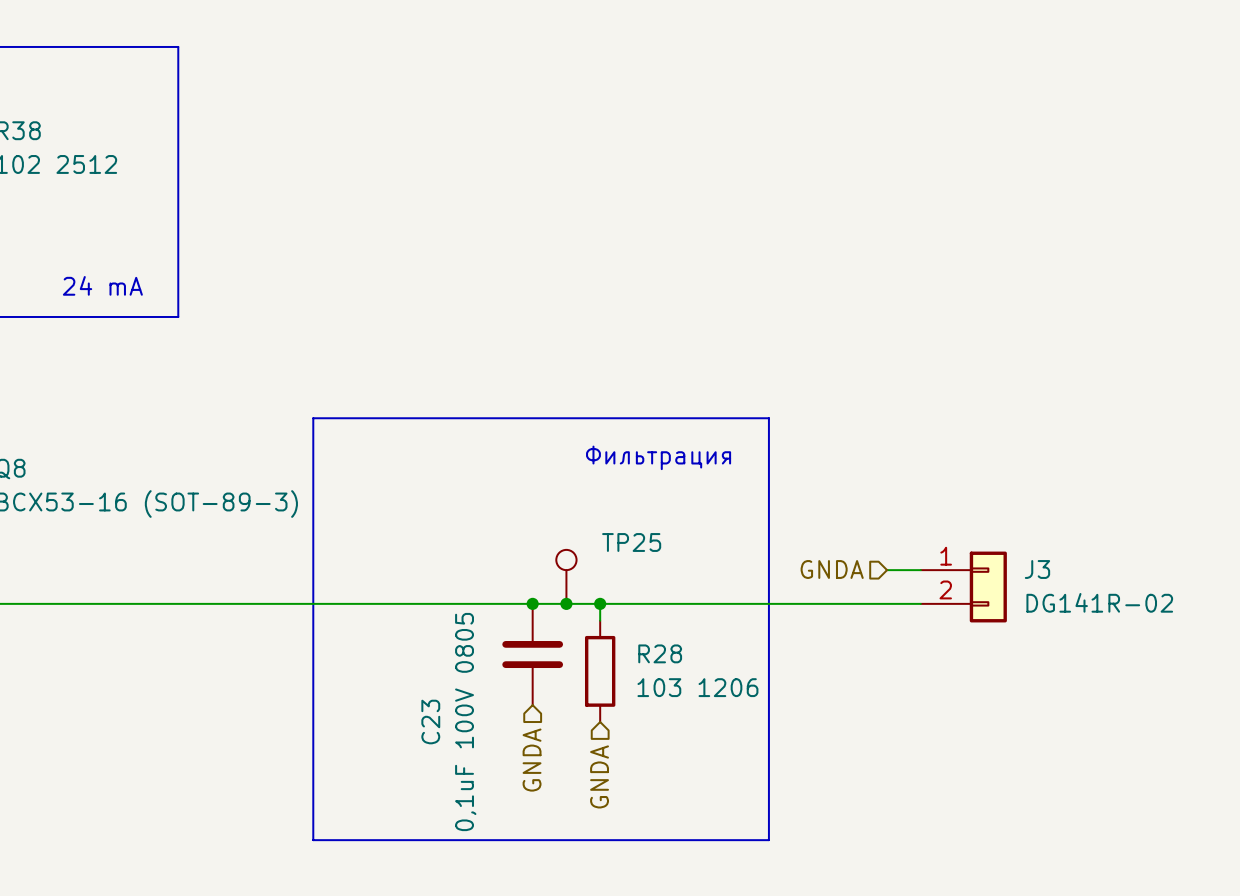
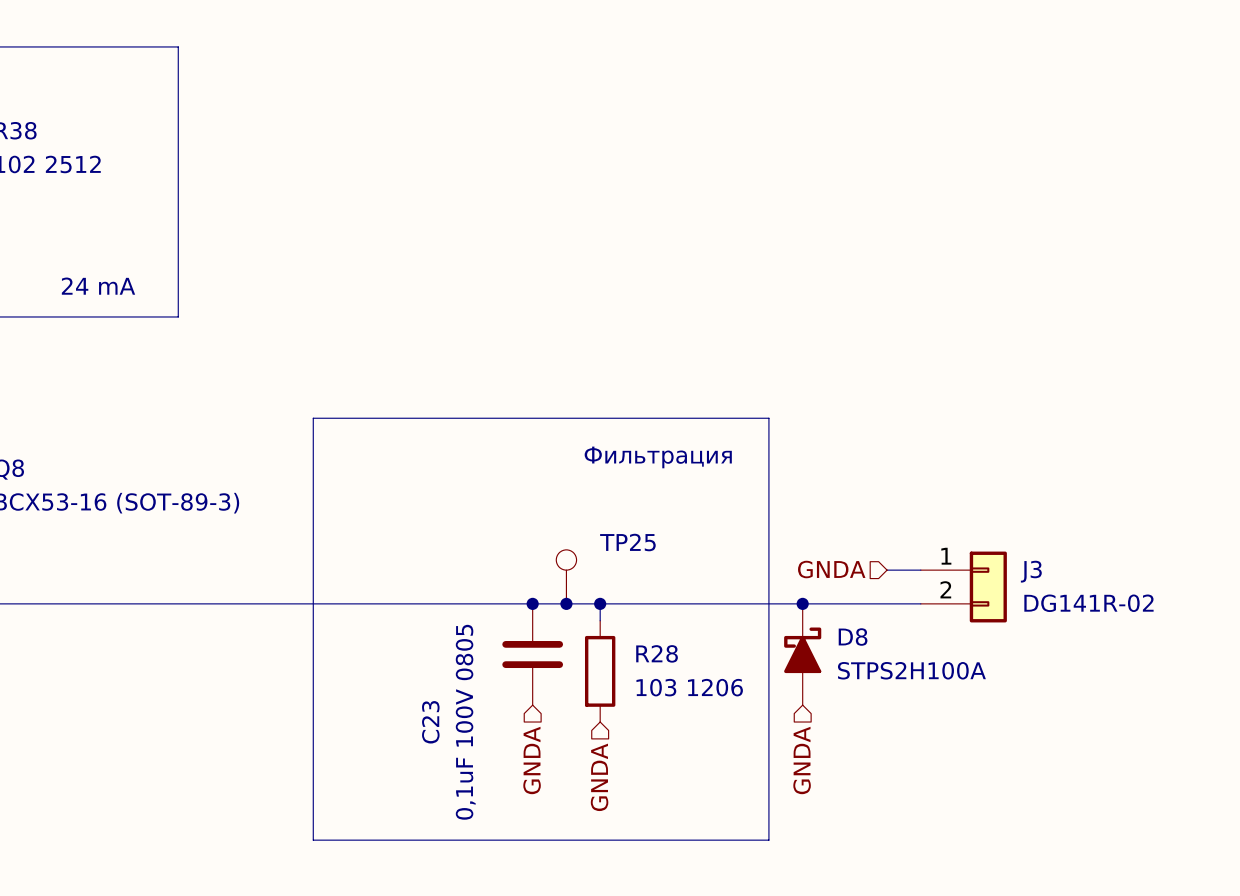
junction: none -> (802, 603)
D8: none -> STPS2H100A (802, 654)
hierarchical label: none -> GNDA (802, 760)

